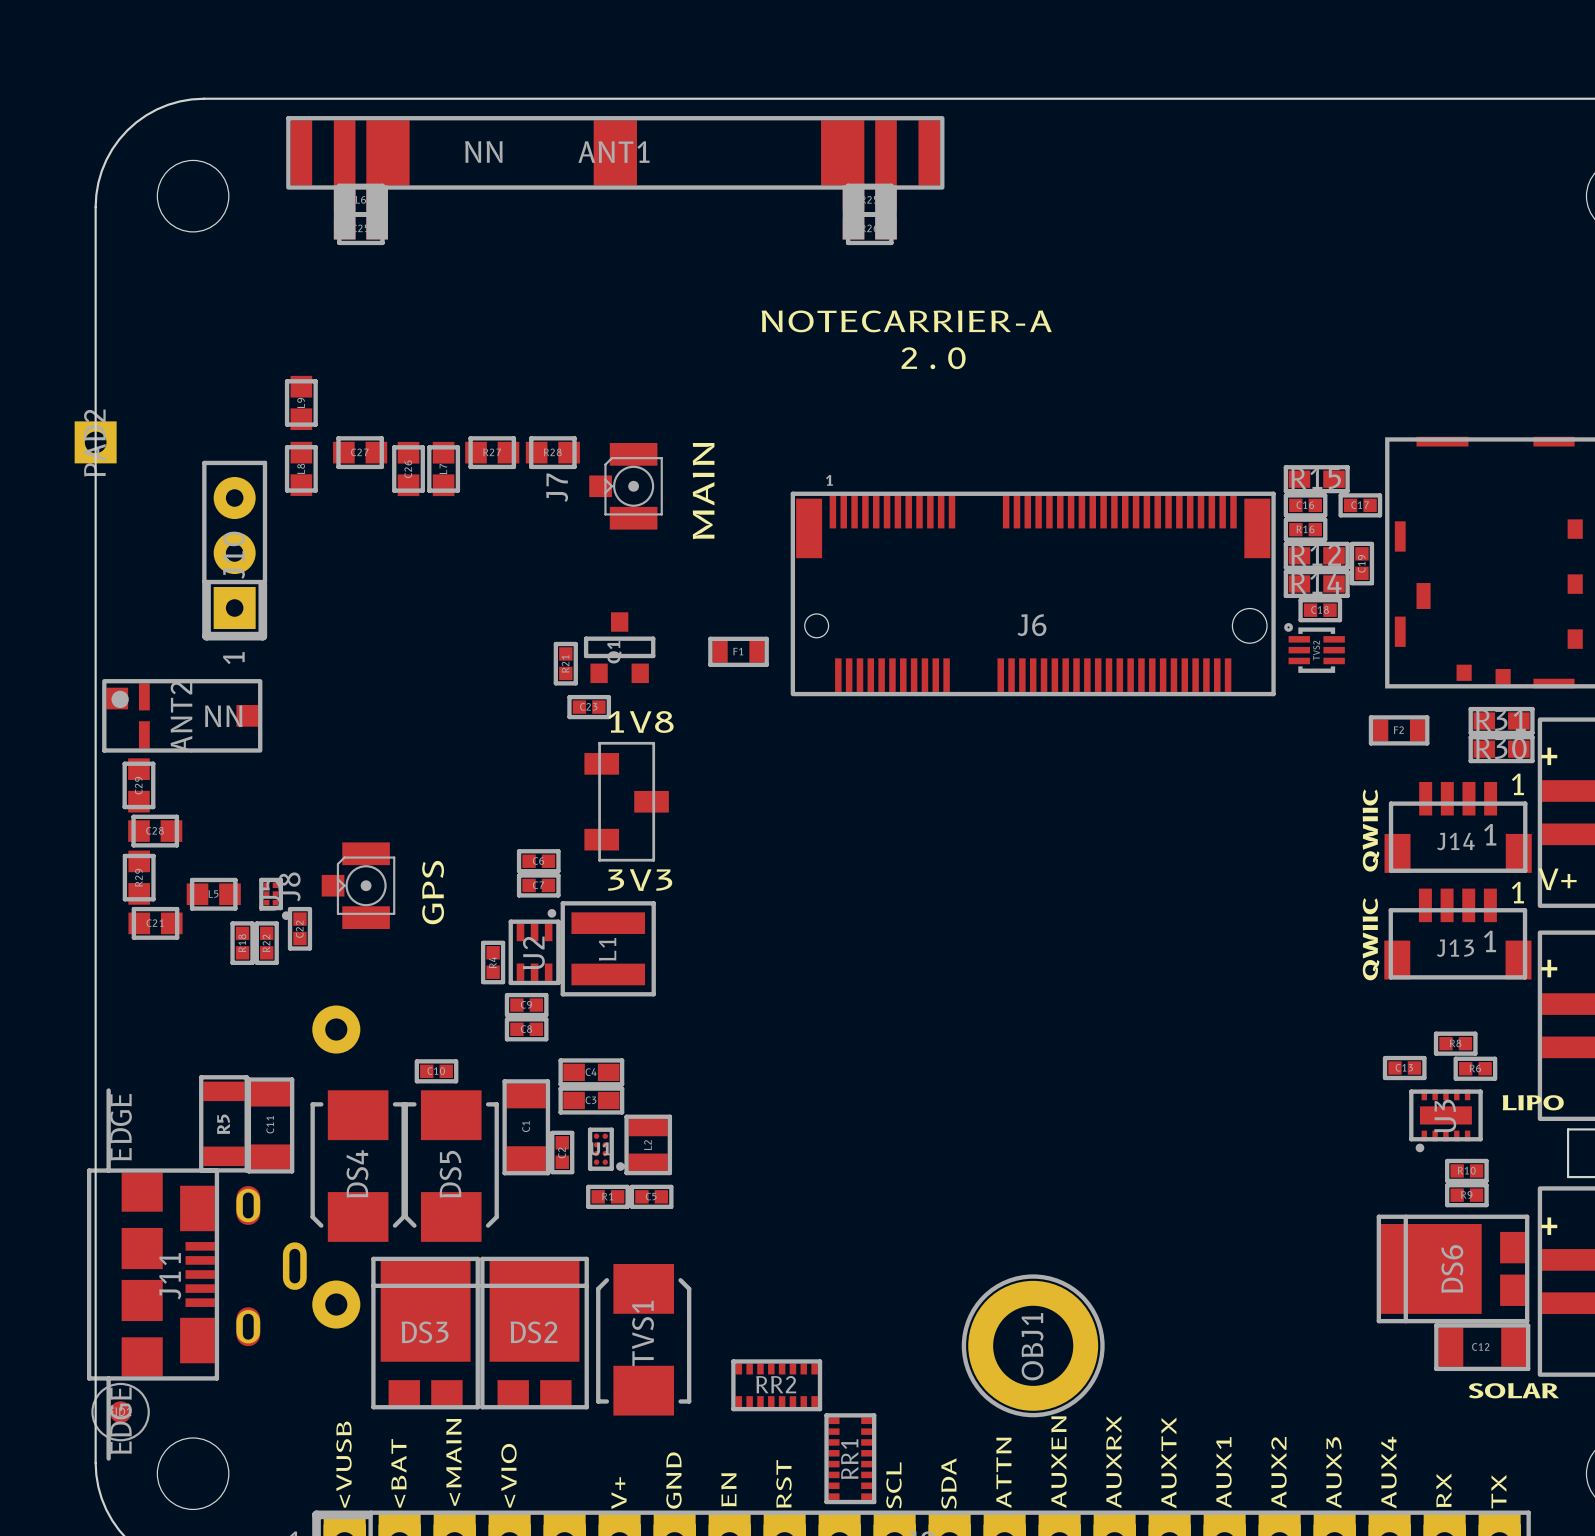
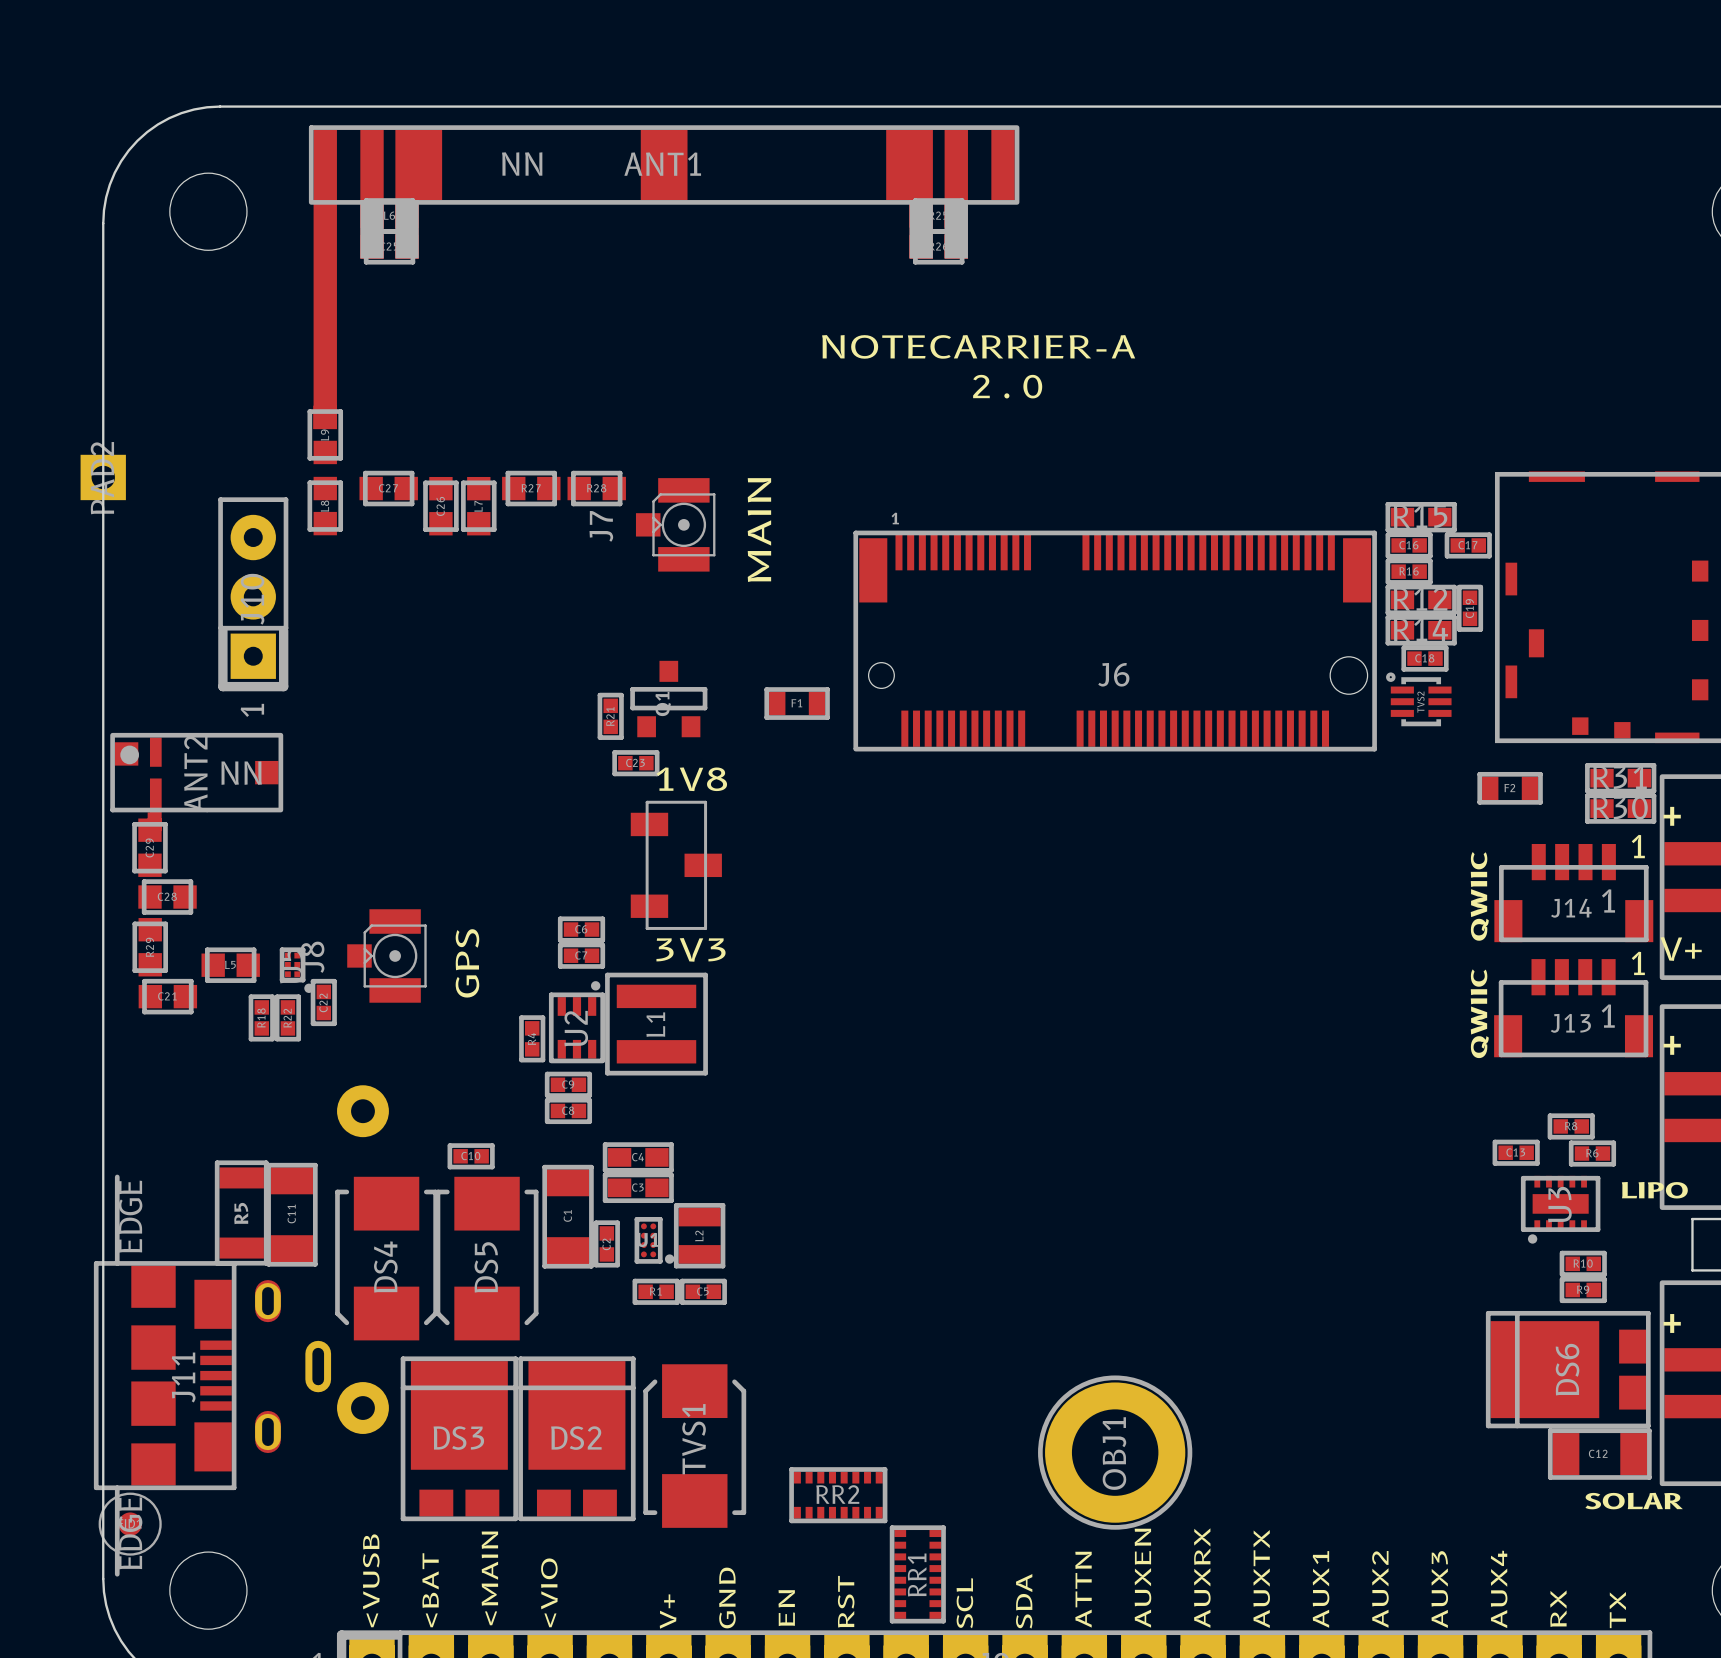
ANT1 footprint: [286, 116, 945, 240] -> [308, 125, 1020, 430]
ANT2 footprint: [102, 679, 263, 753] -> [110, 732, 284, 832]

